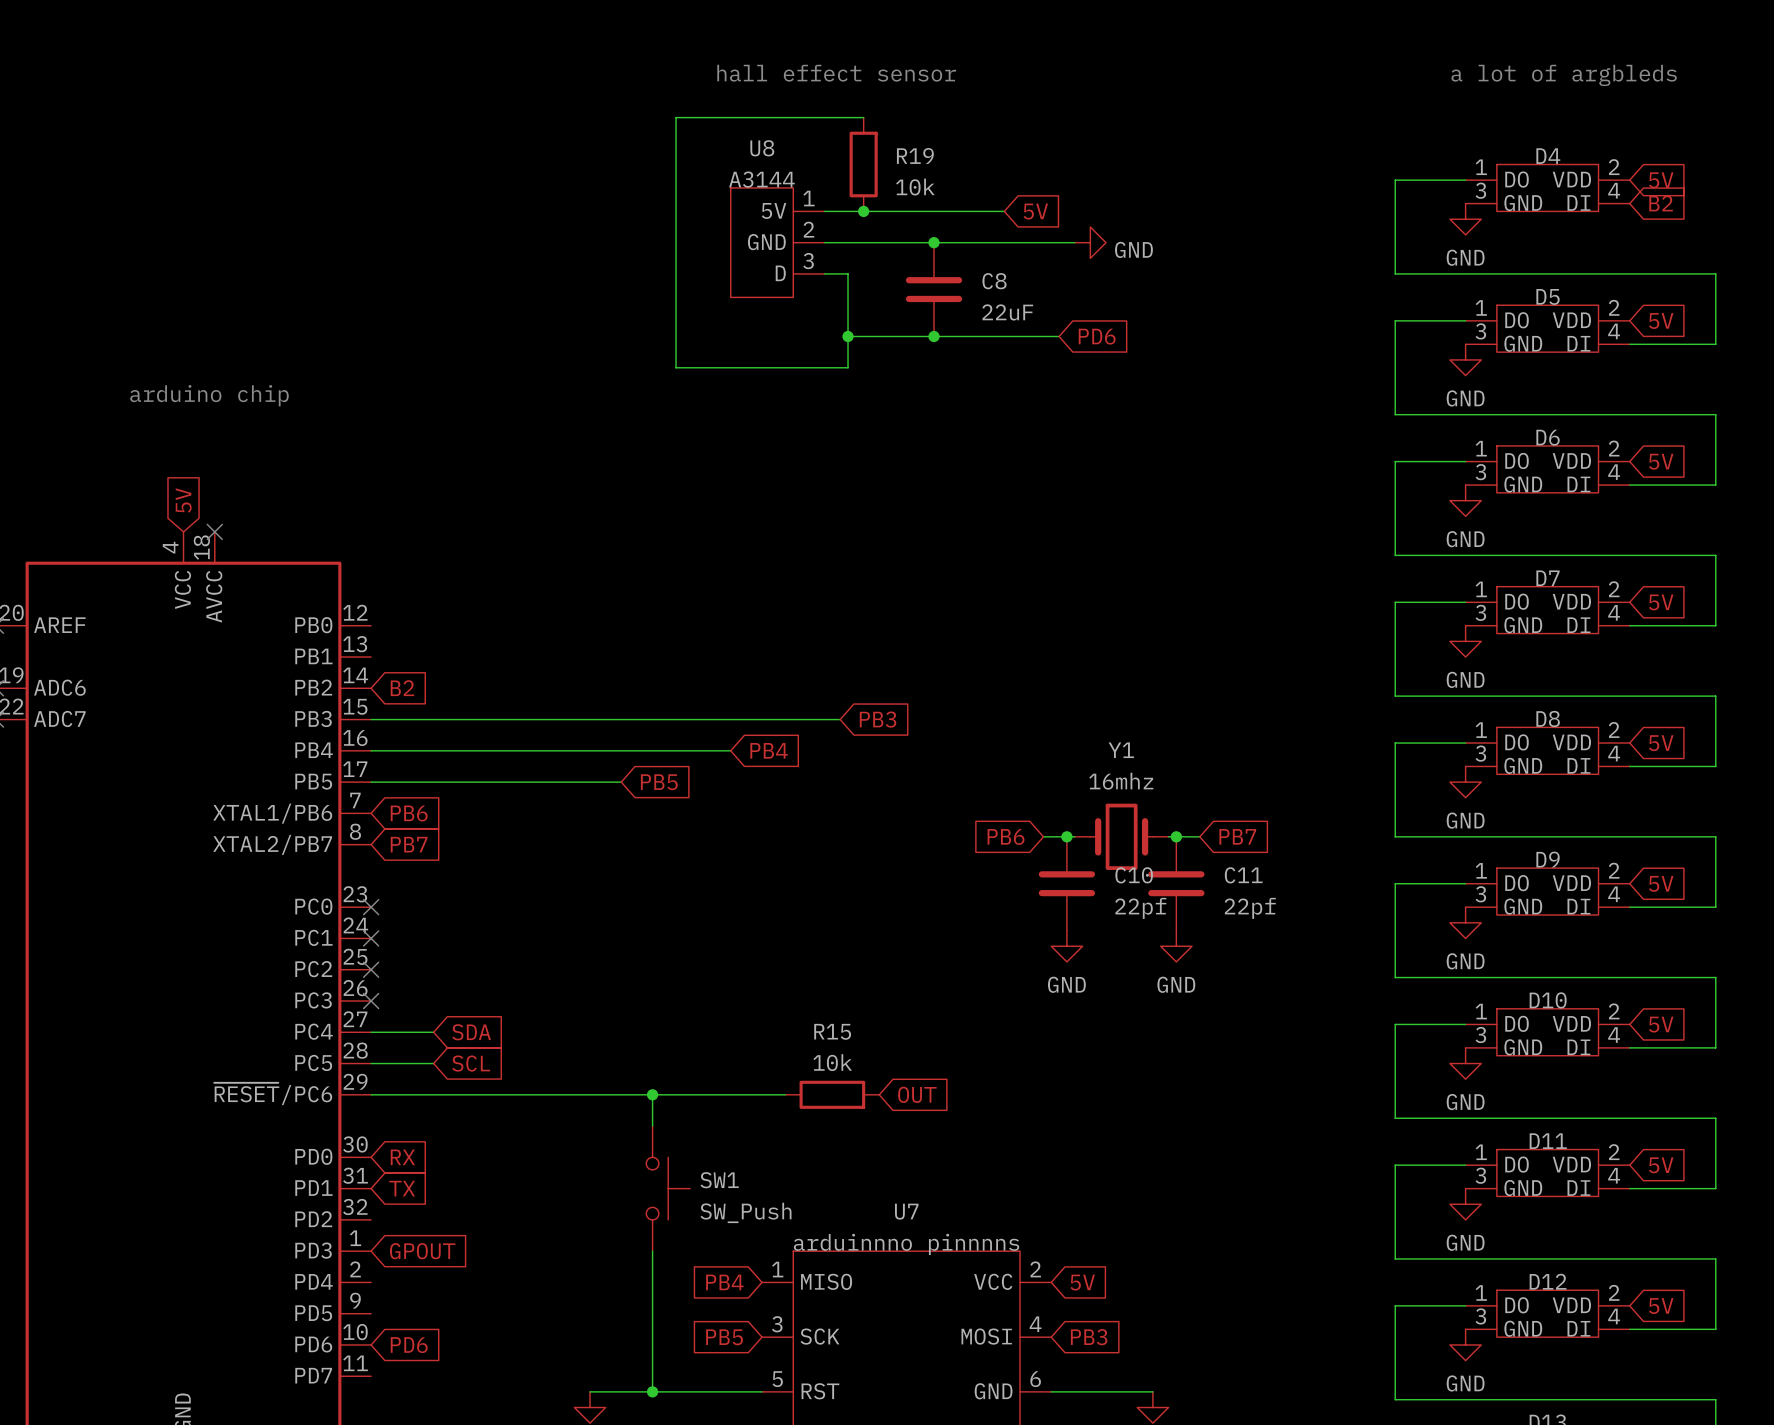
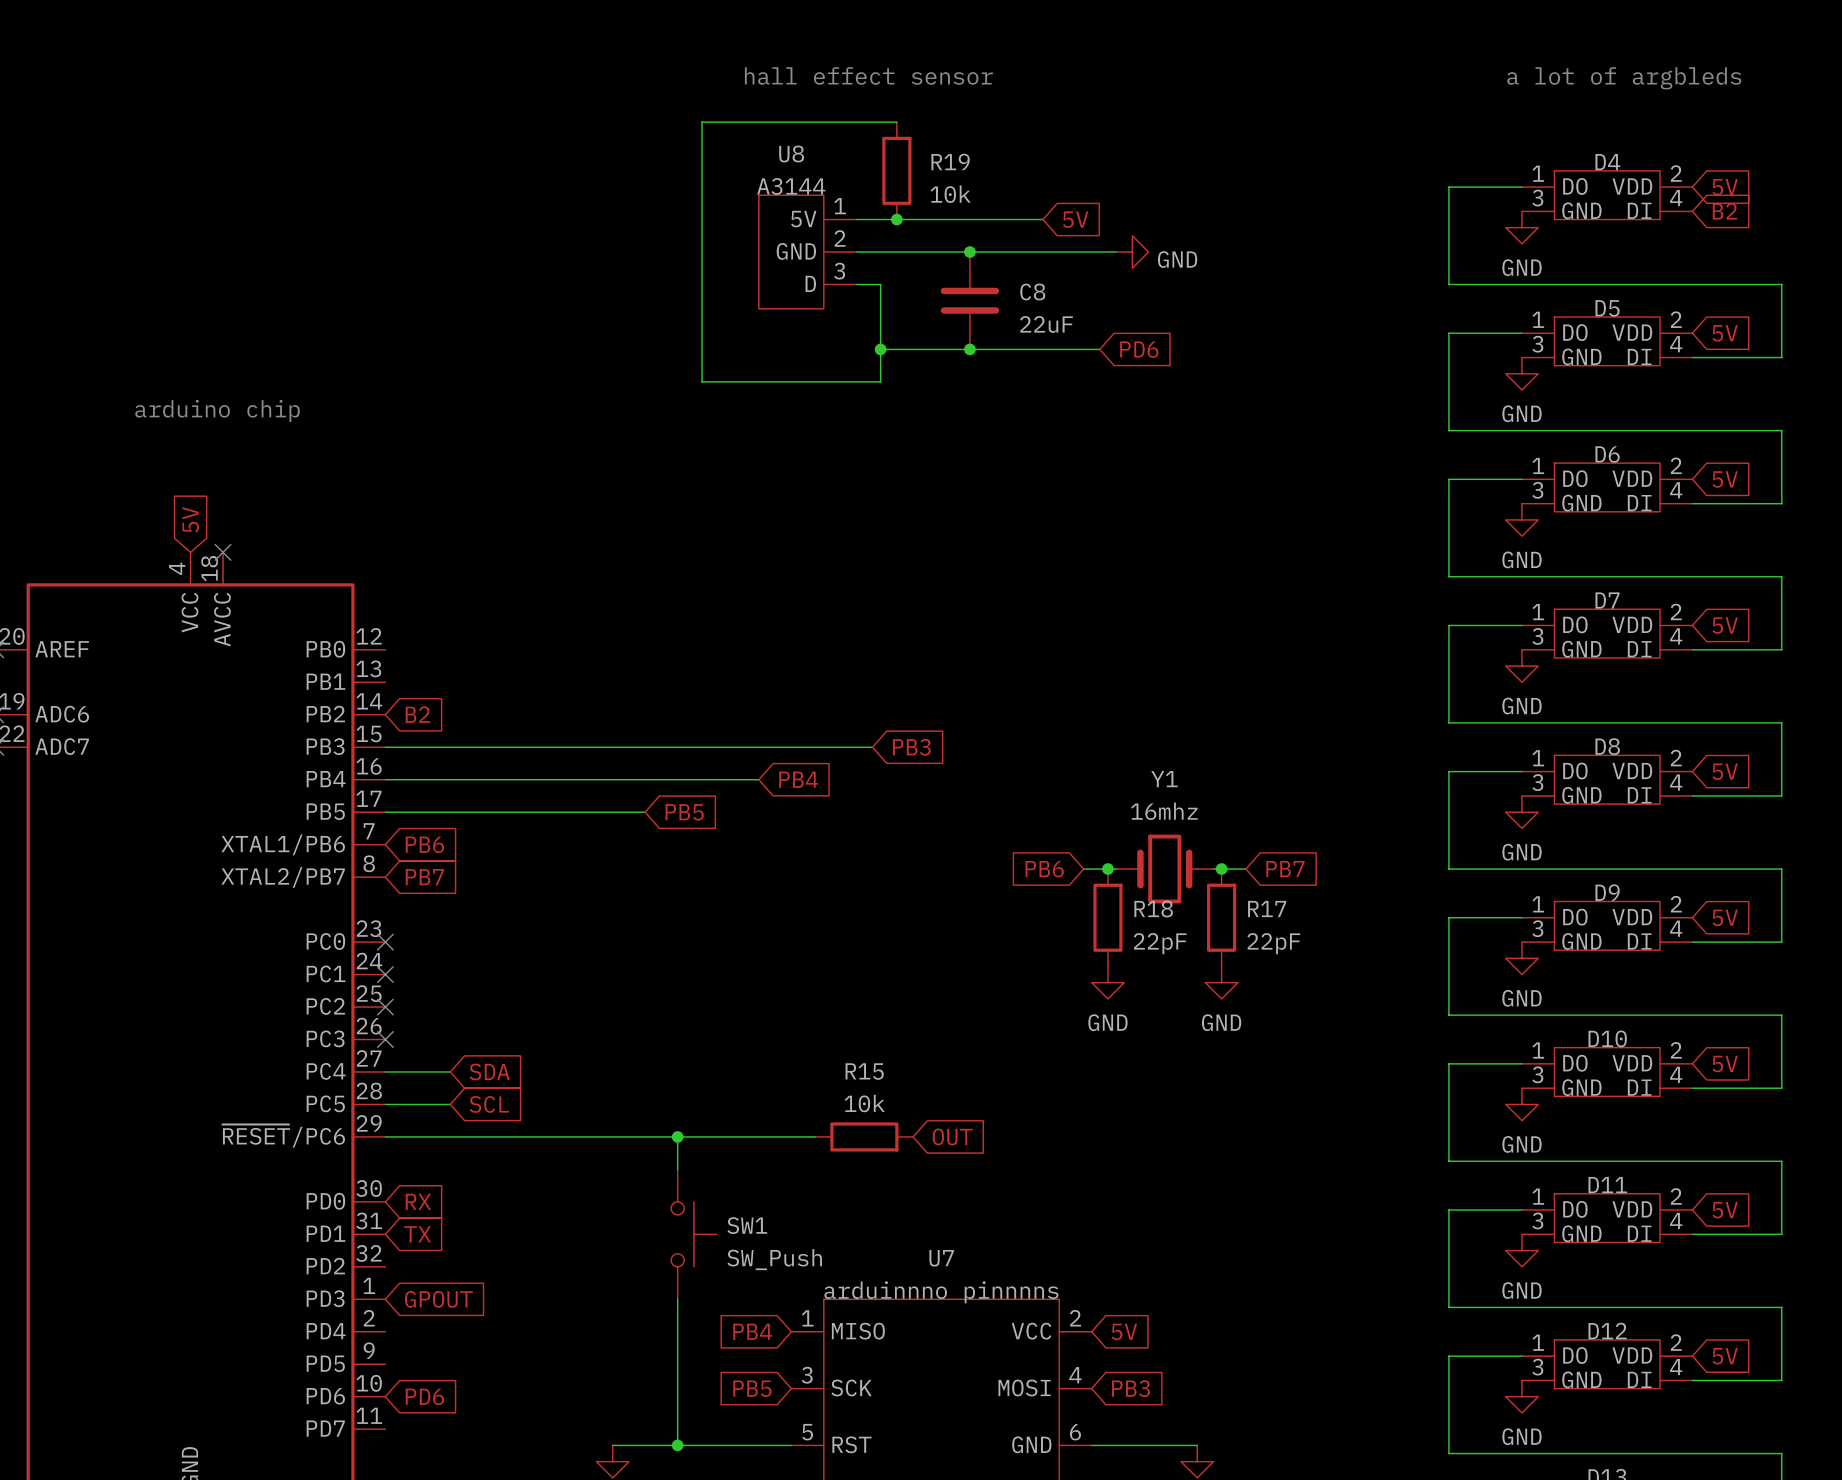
C10: 22pf (1066, 883) -> none
R18: none -> 22pF (1107, 917)
C11: 22pf (1176, 883) -> none
R17: none -> 22pF (1221, 917)

